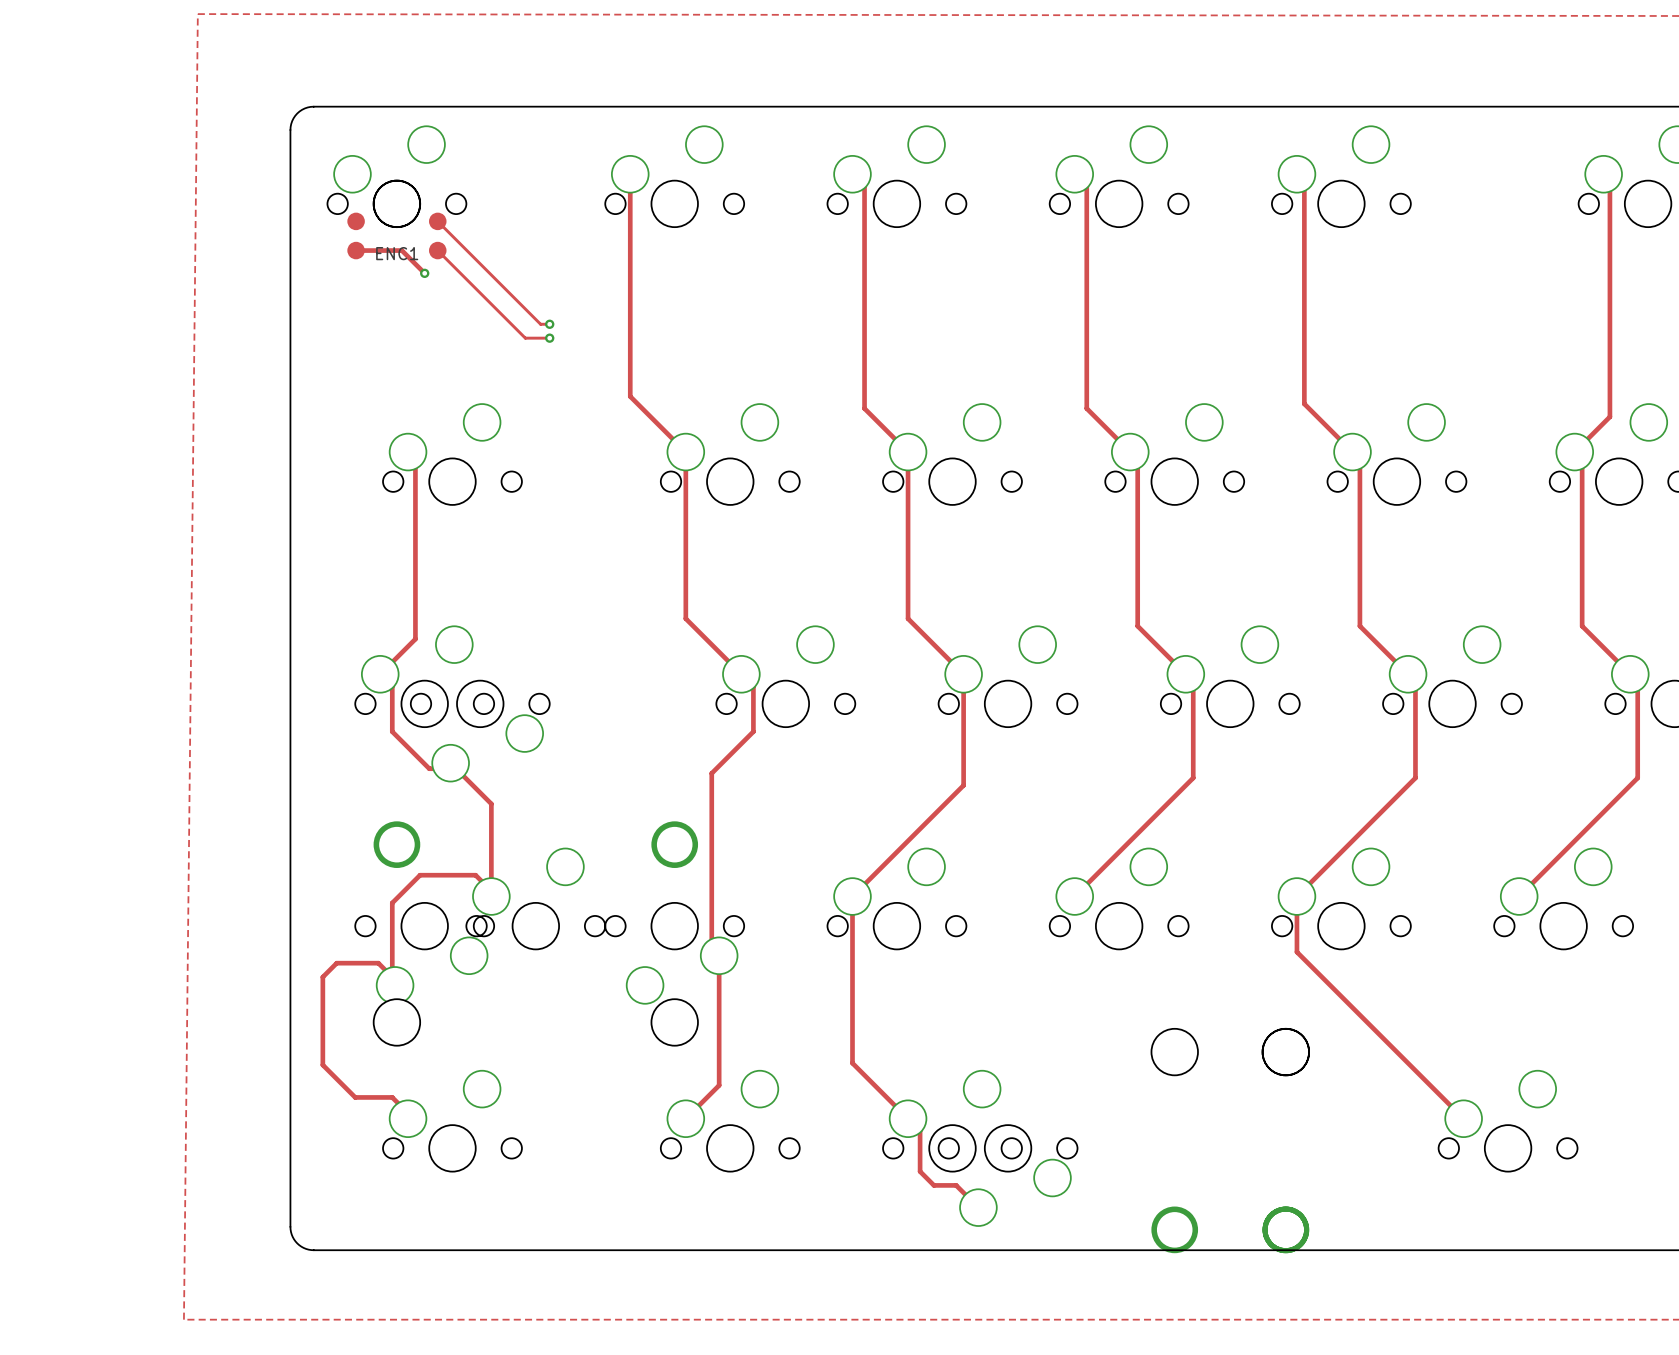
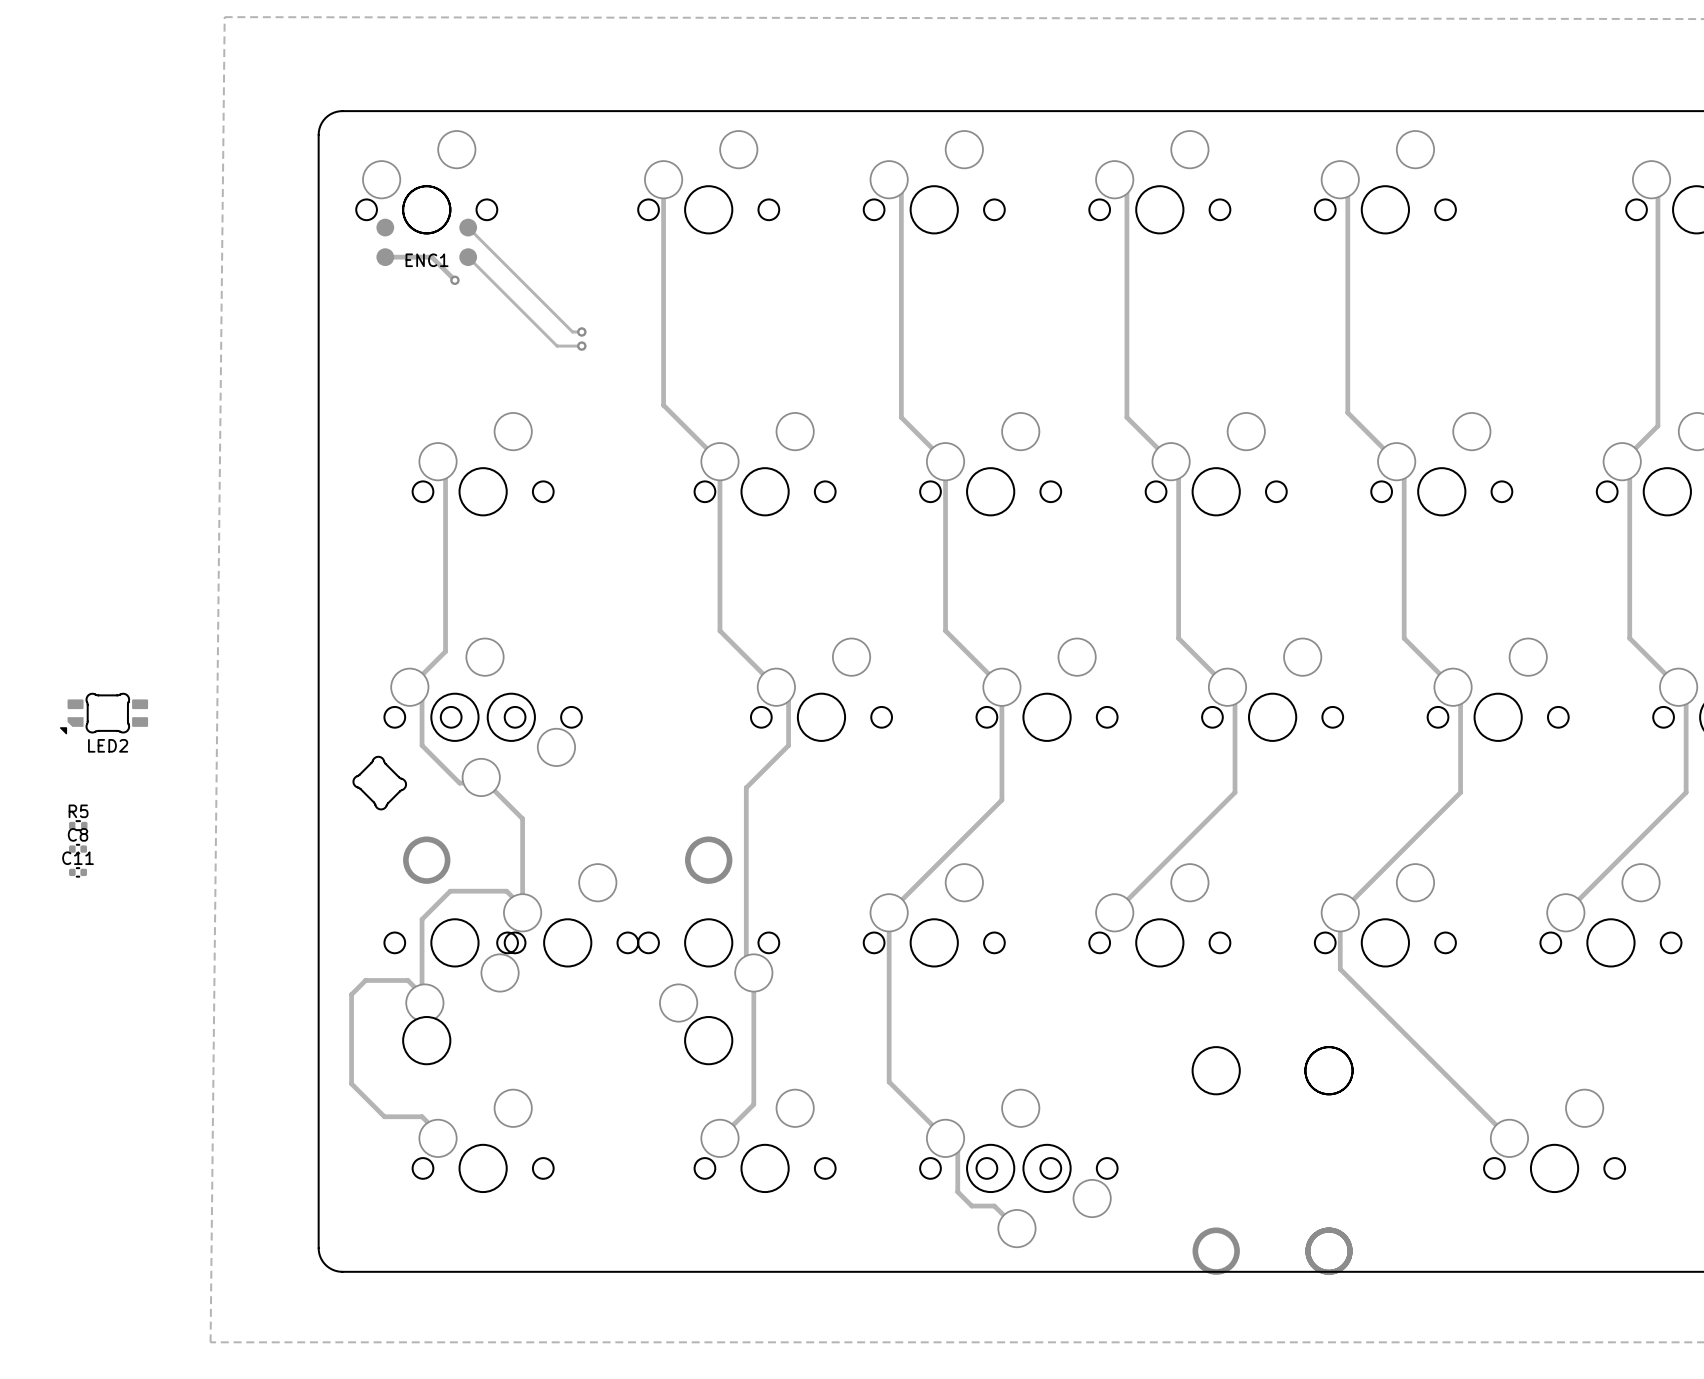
LED2: none -> (104, 713)
part: none -> (379, 783)
R5: none -> (78, 825)
C8: none -> (78, 849)
C11: none -> (78, 872)

